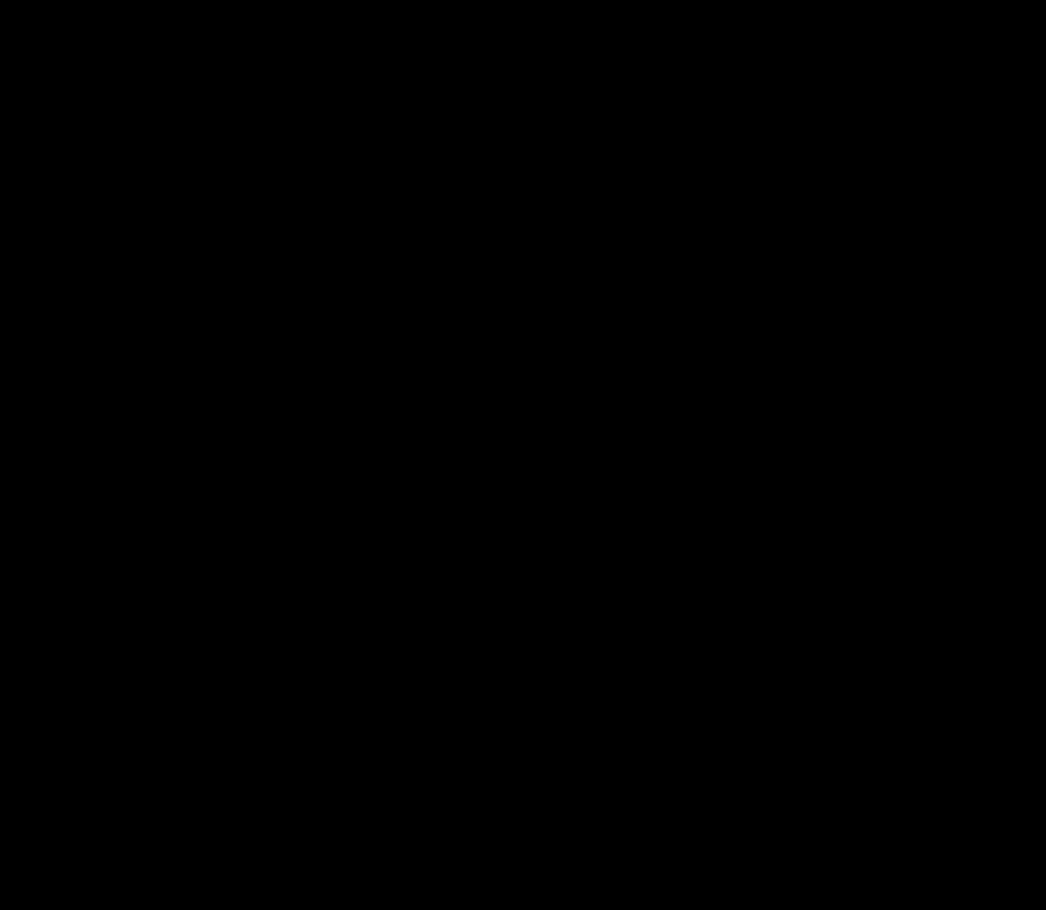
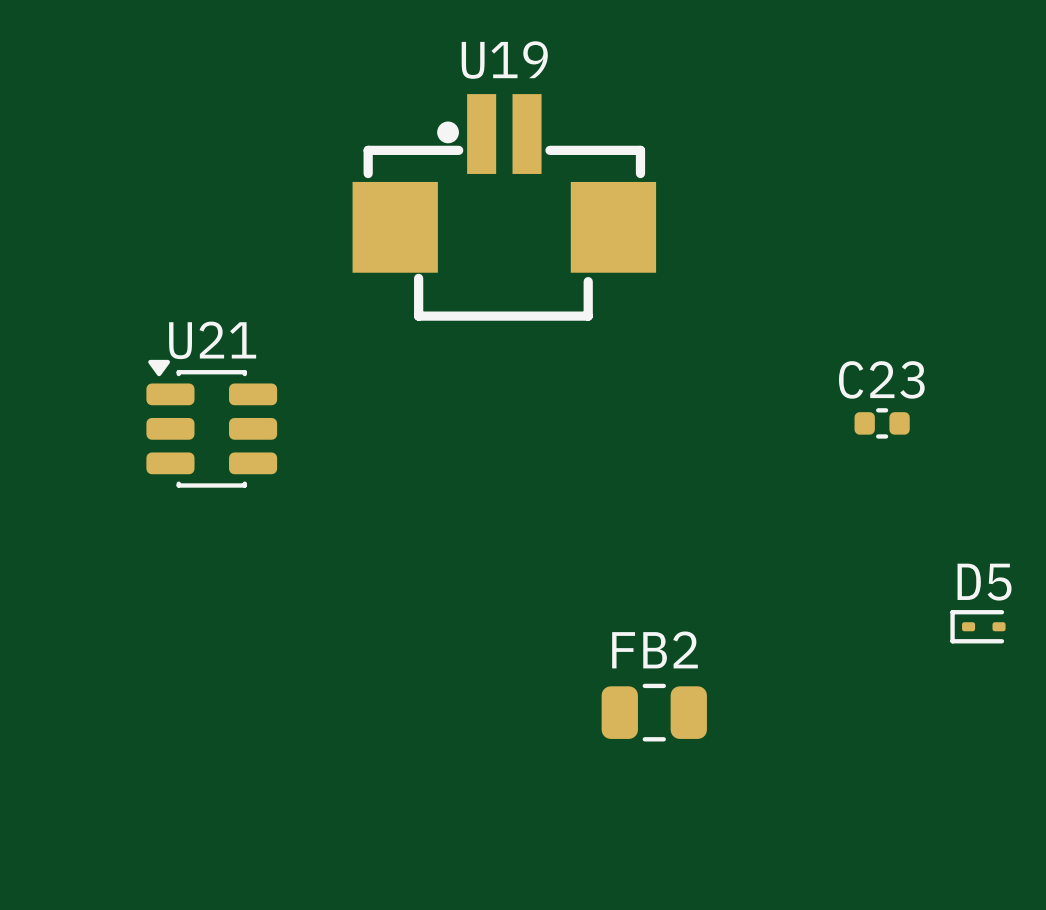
U19: none -> (504, 207)
U21: none -> (211, 423)
C23: none -> (882, 423)
D5: none -> (977, 626)
FB2: none -> (654, 712)

